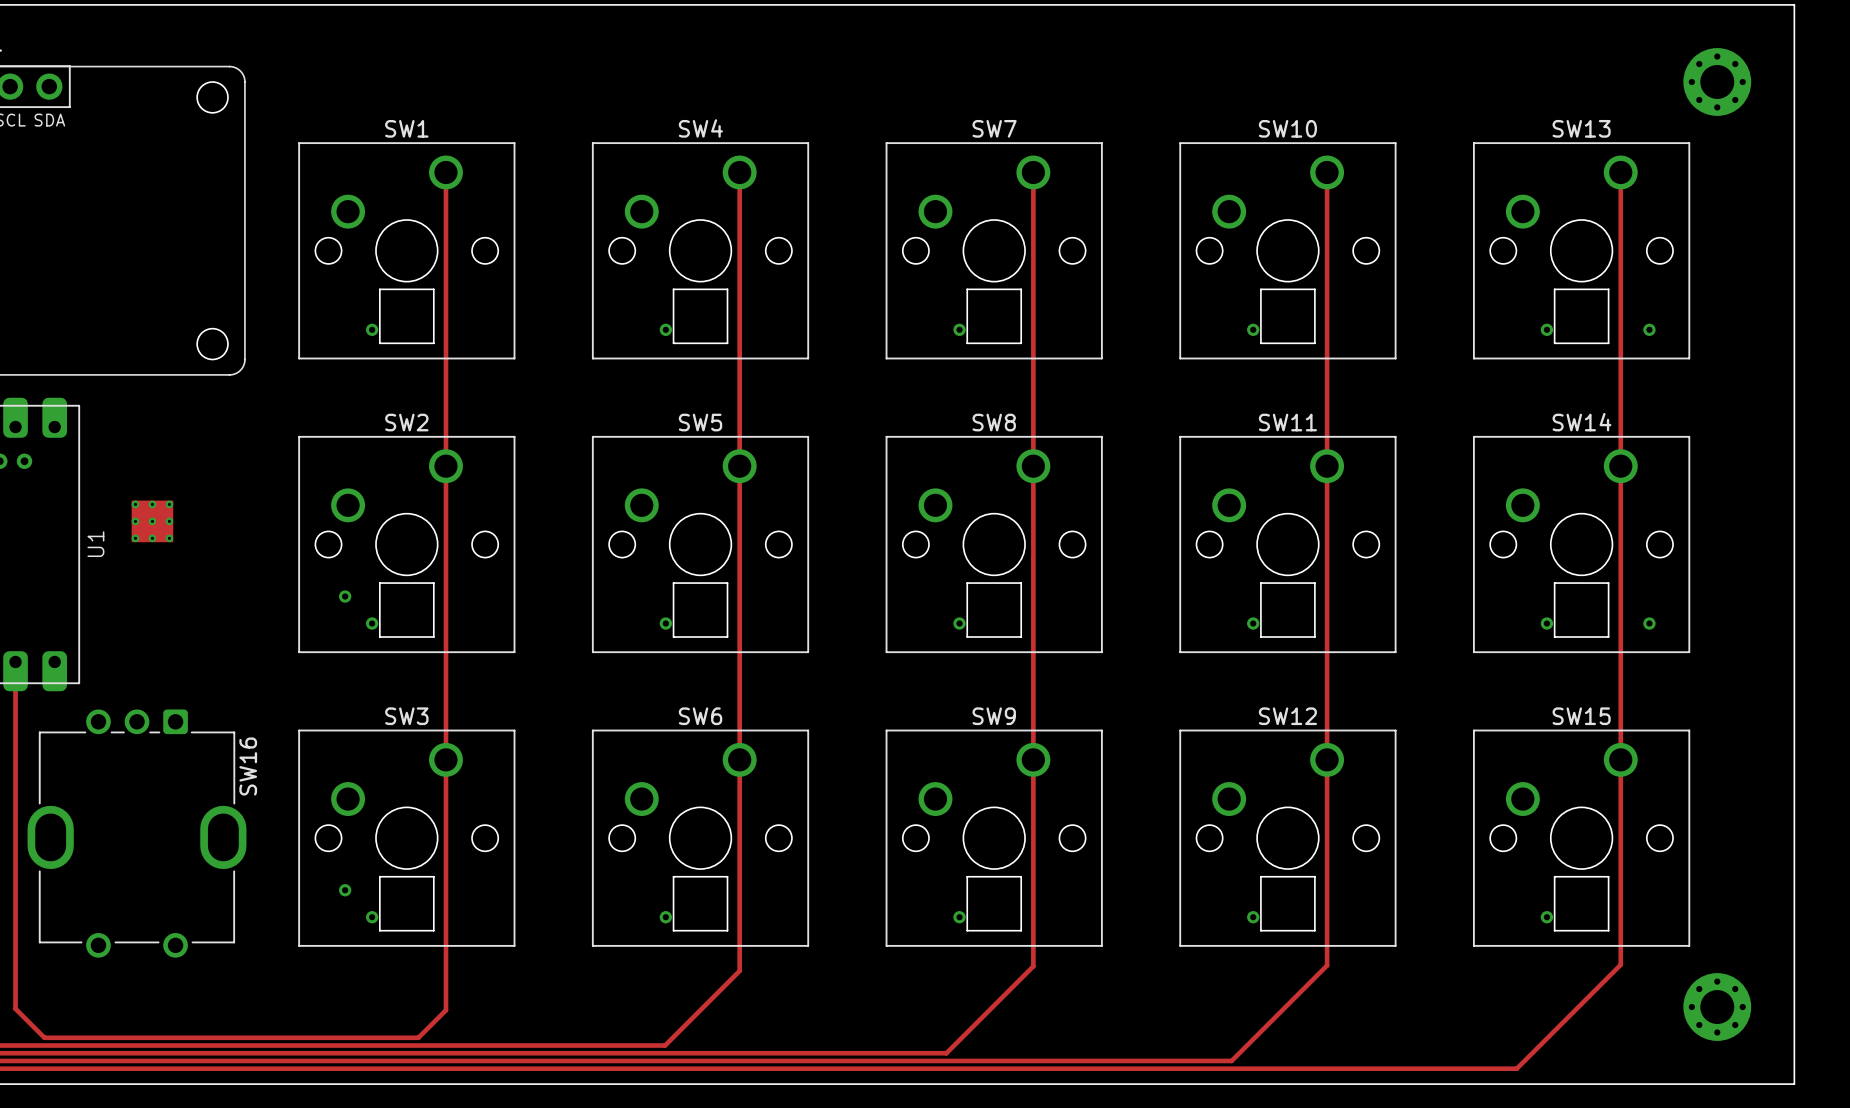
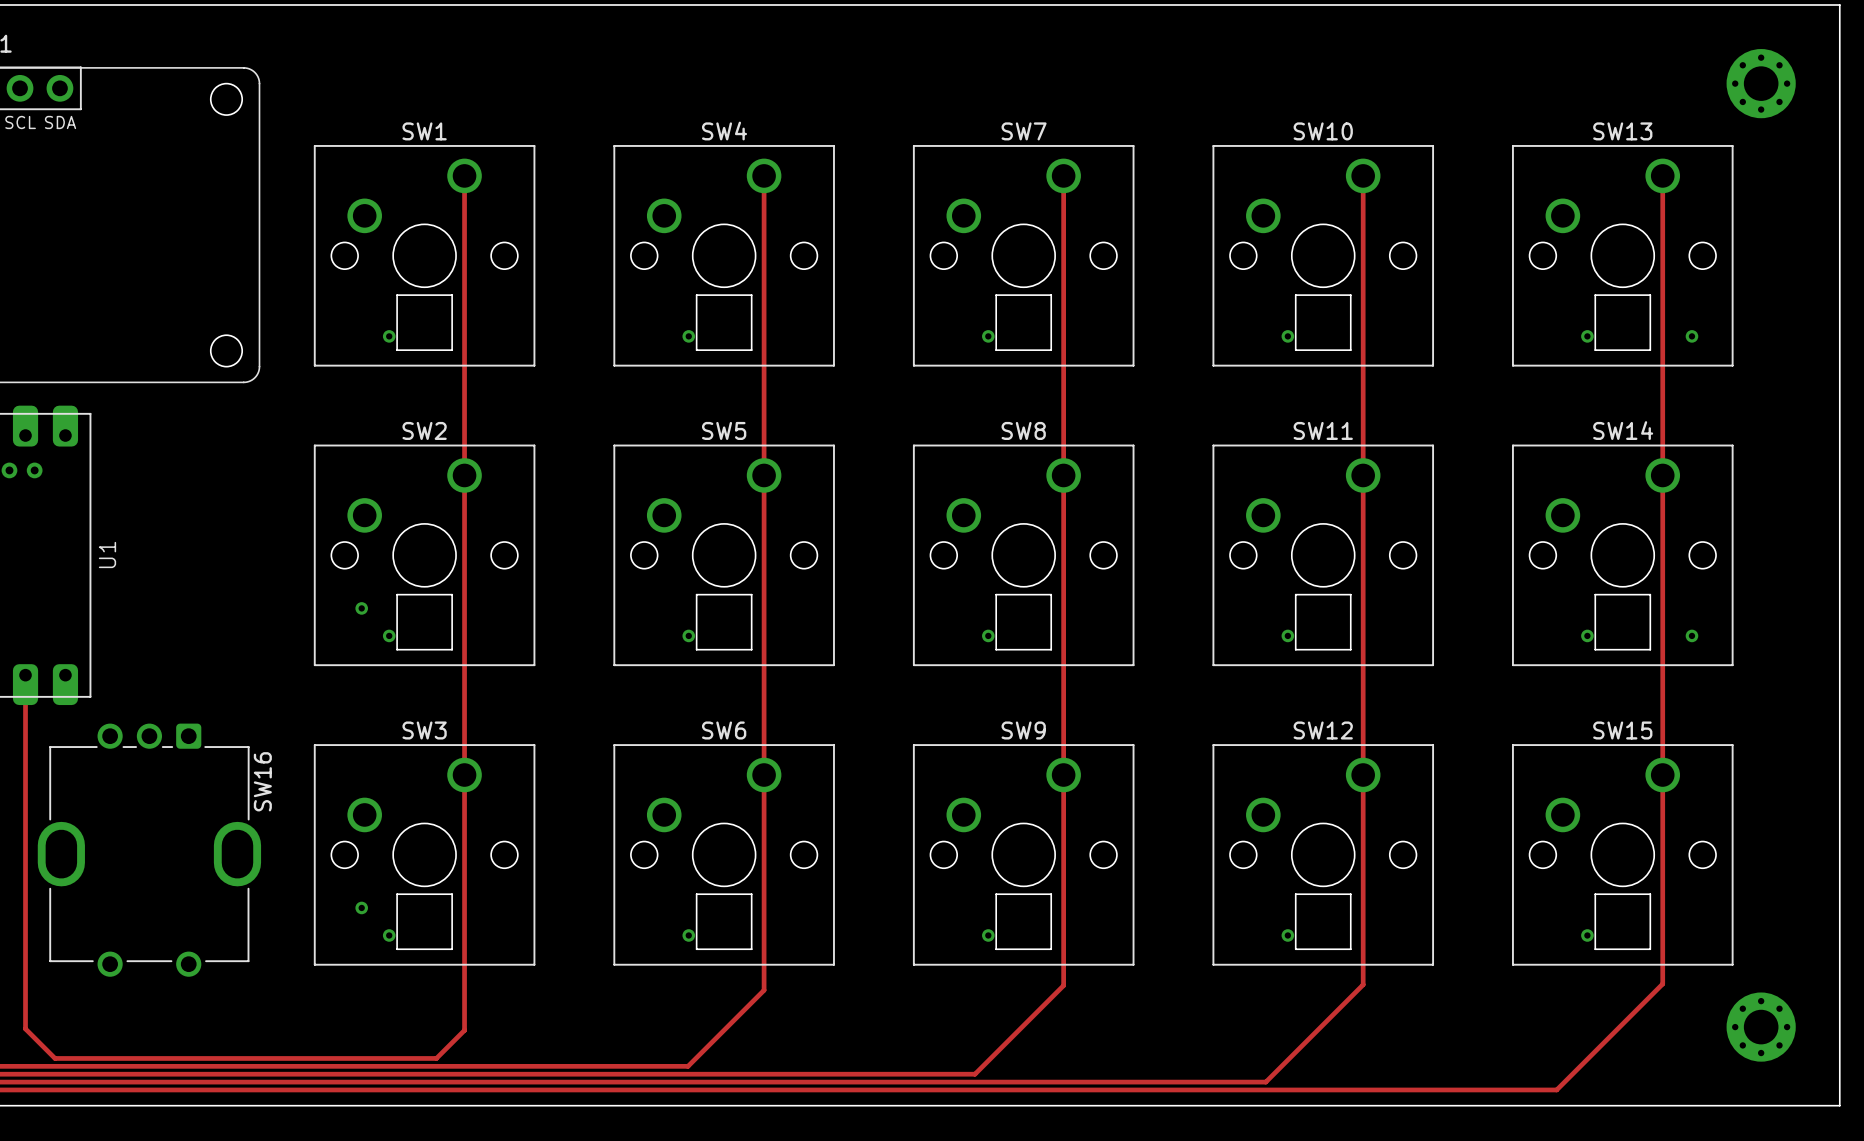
part: (152, 521) -> none

